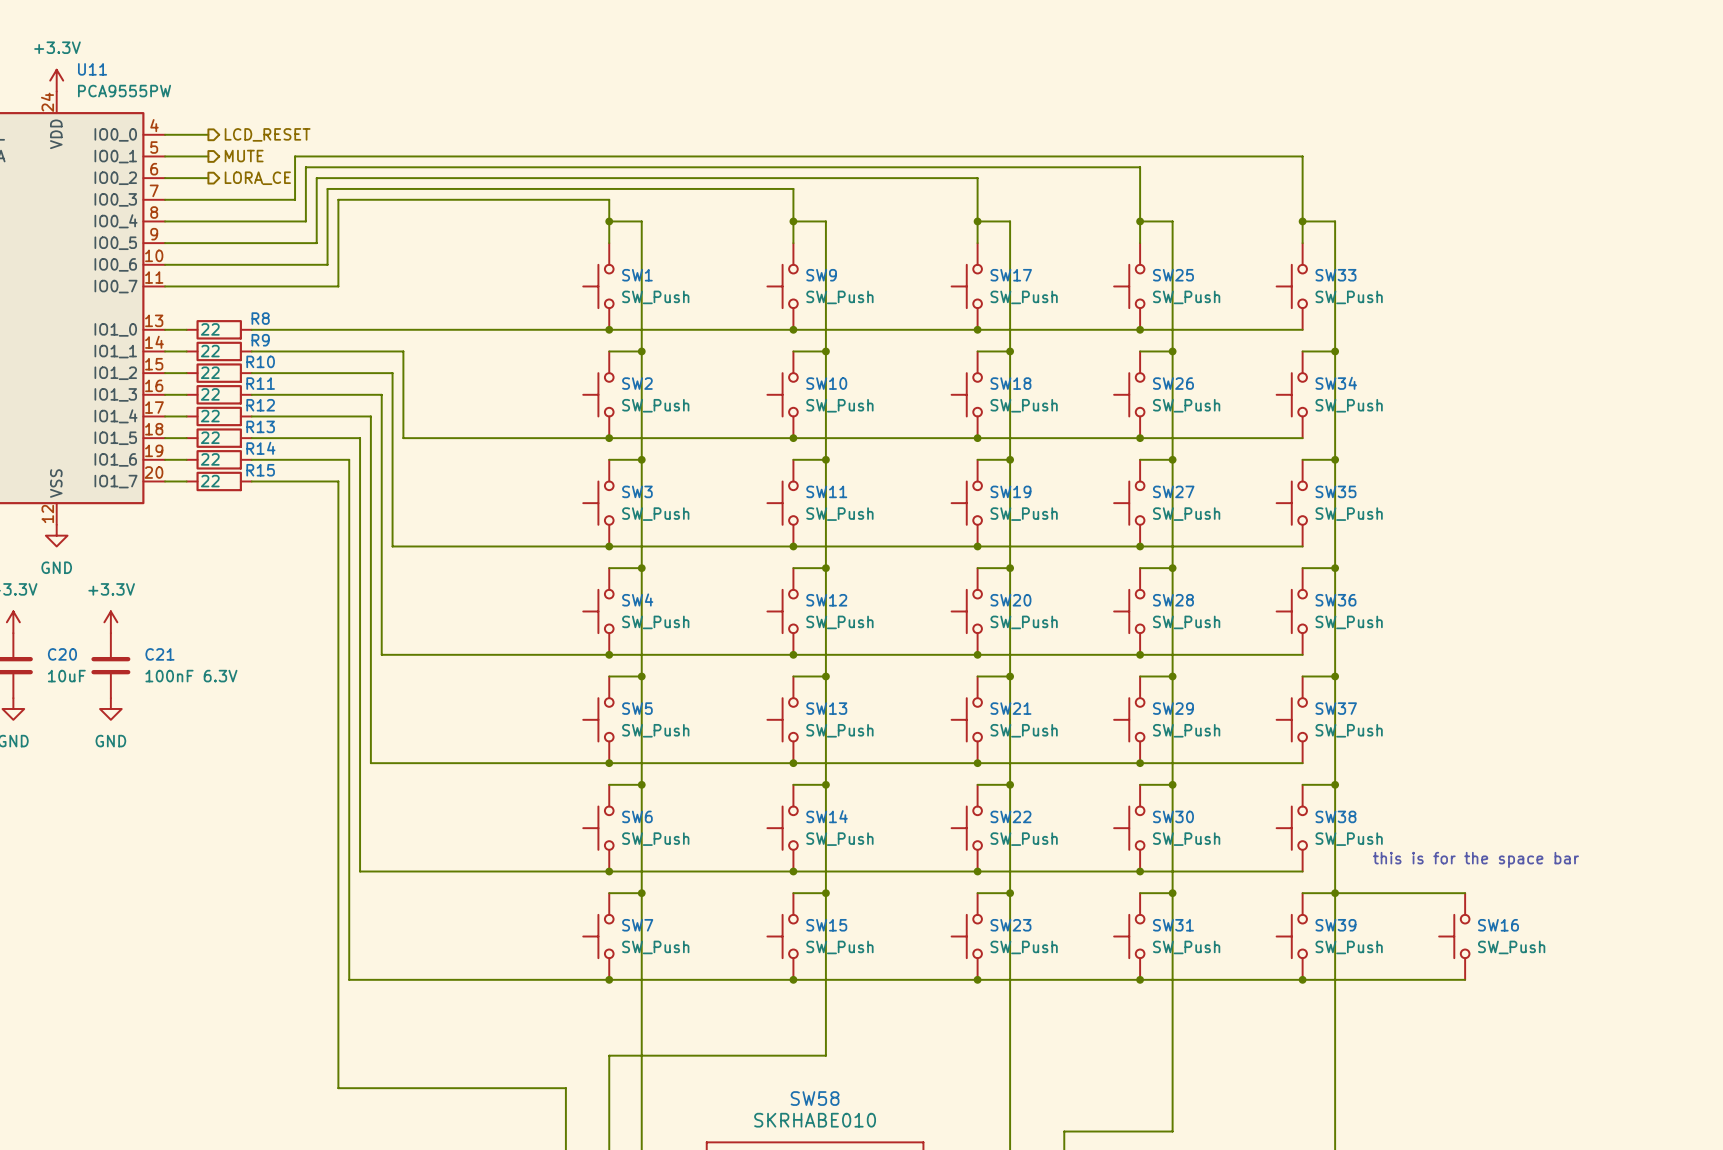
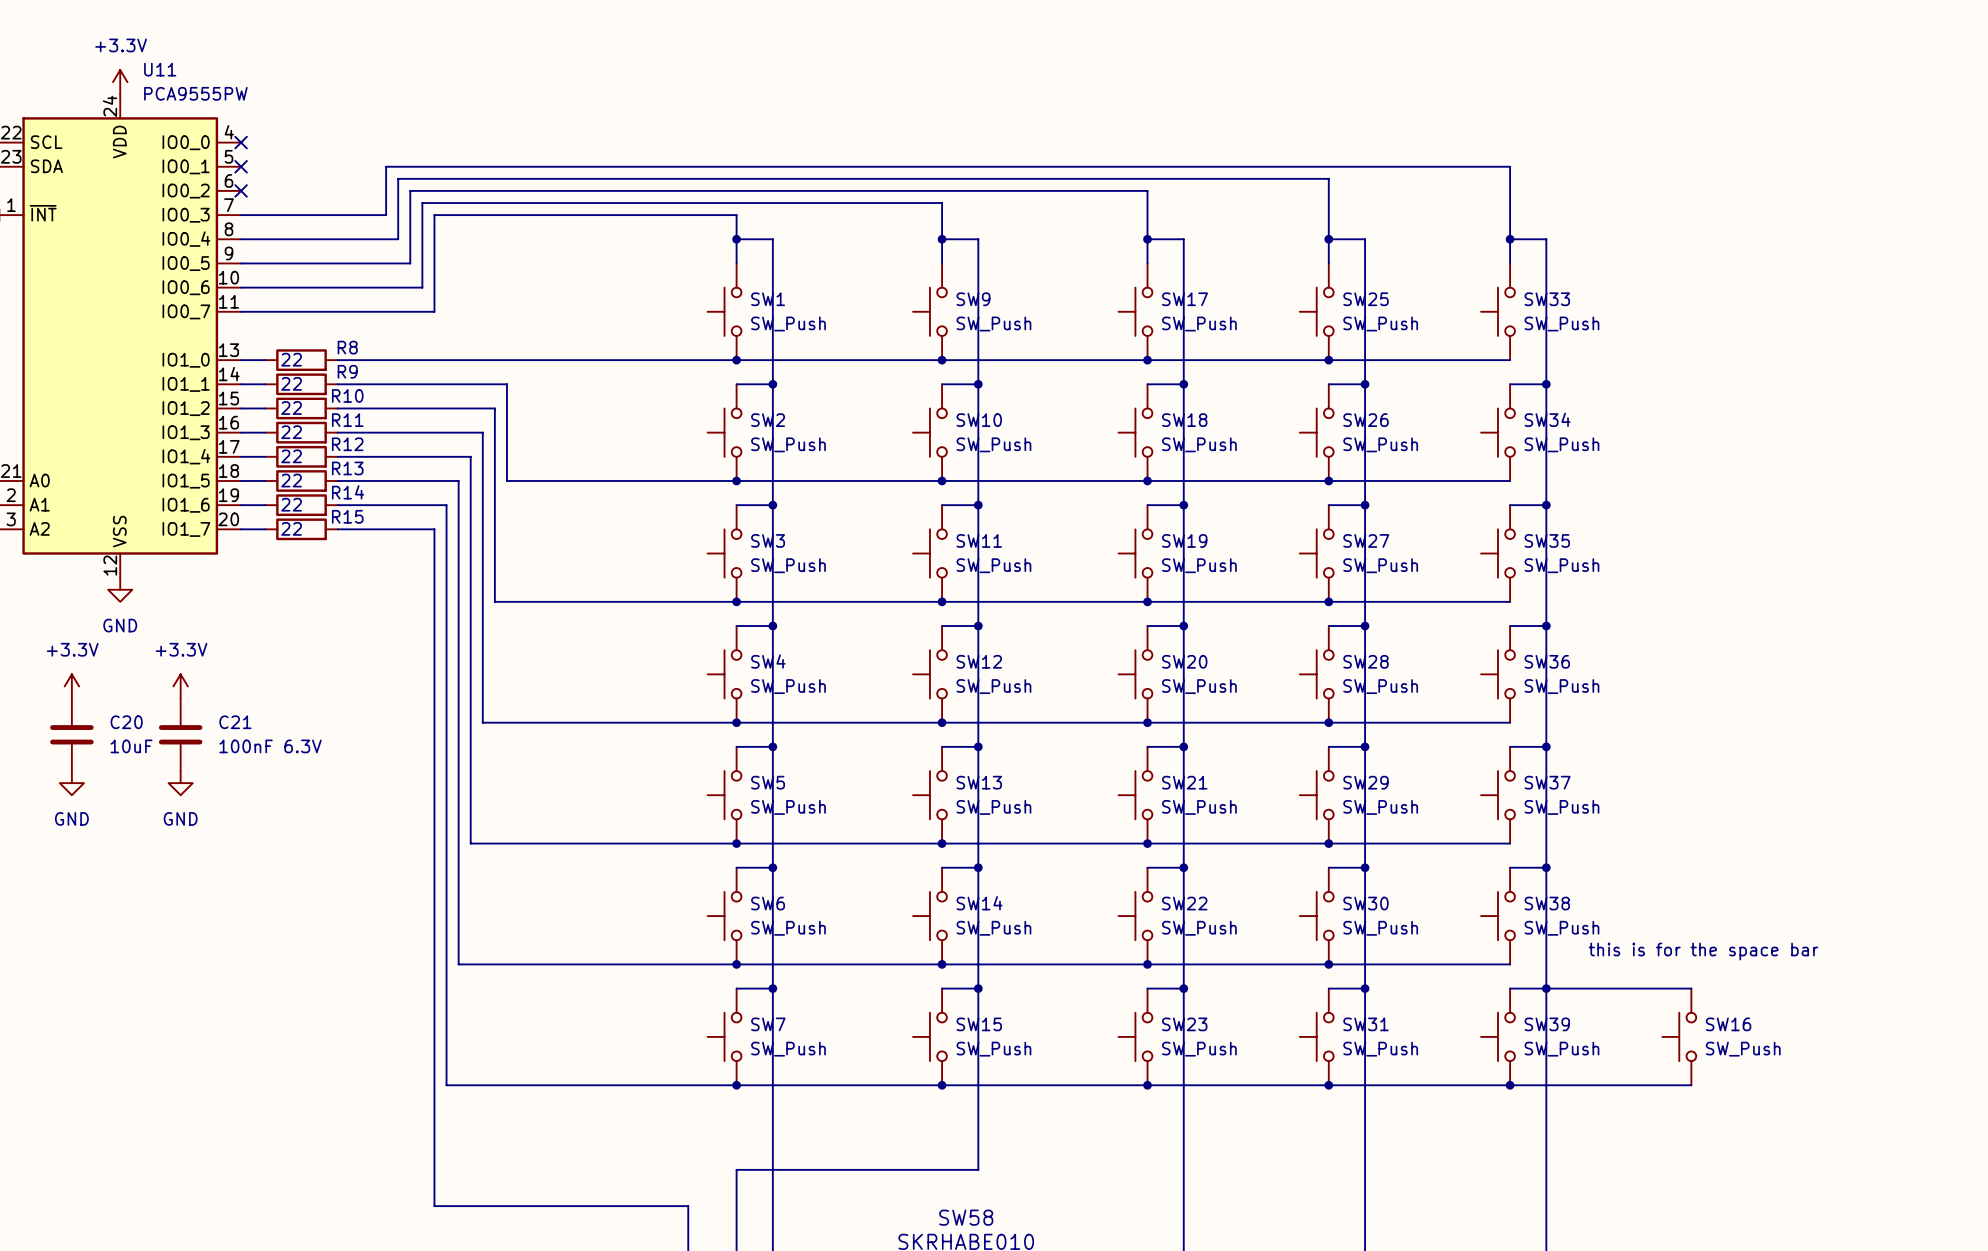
wire: (165, 134) (208, 134) -> none
no-connect mark: none -> (241, 142)
hierarchical label: LCD_RESET (267, 134) -> none
wire: (165, 156) (208, 156) -> none
no-connect mark: none -> (241, 166)
hierarchical label: MUTE (244, 156) -> none
wire: (165, 178) (208, 178) -> none
no-connect mark: none -> (241, 190)
hierarchical label: LORA_CE (257, 178) -> none

